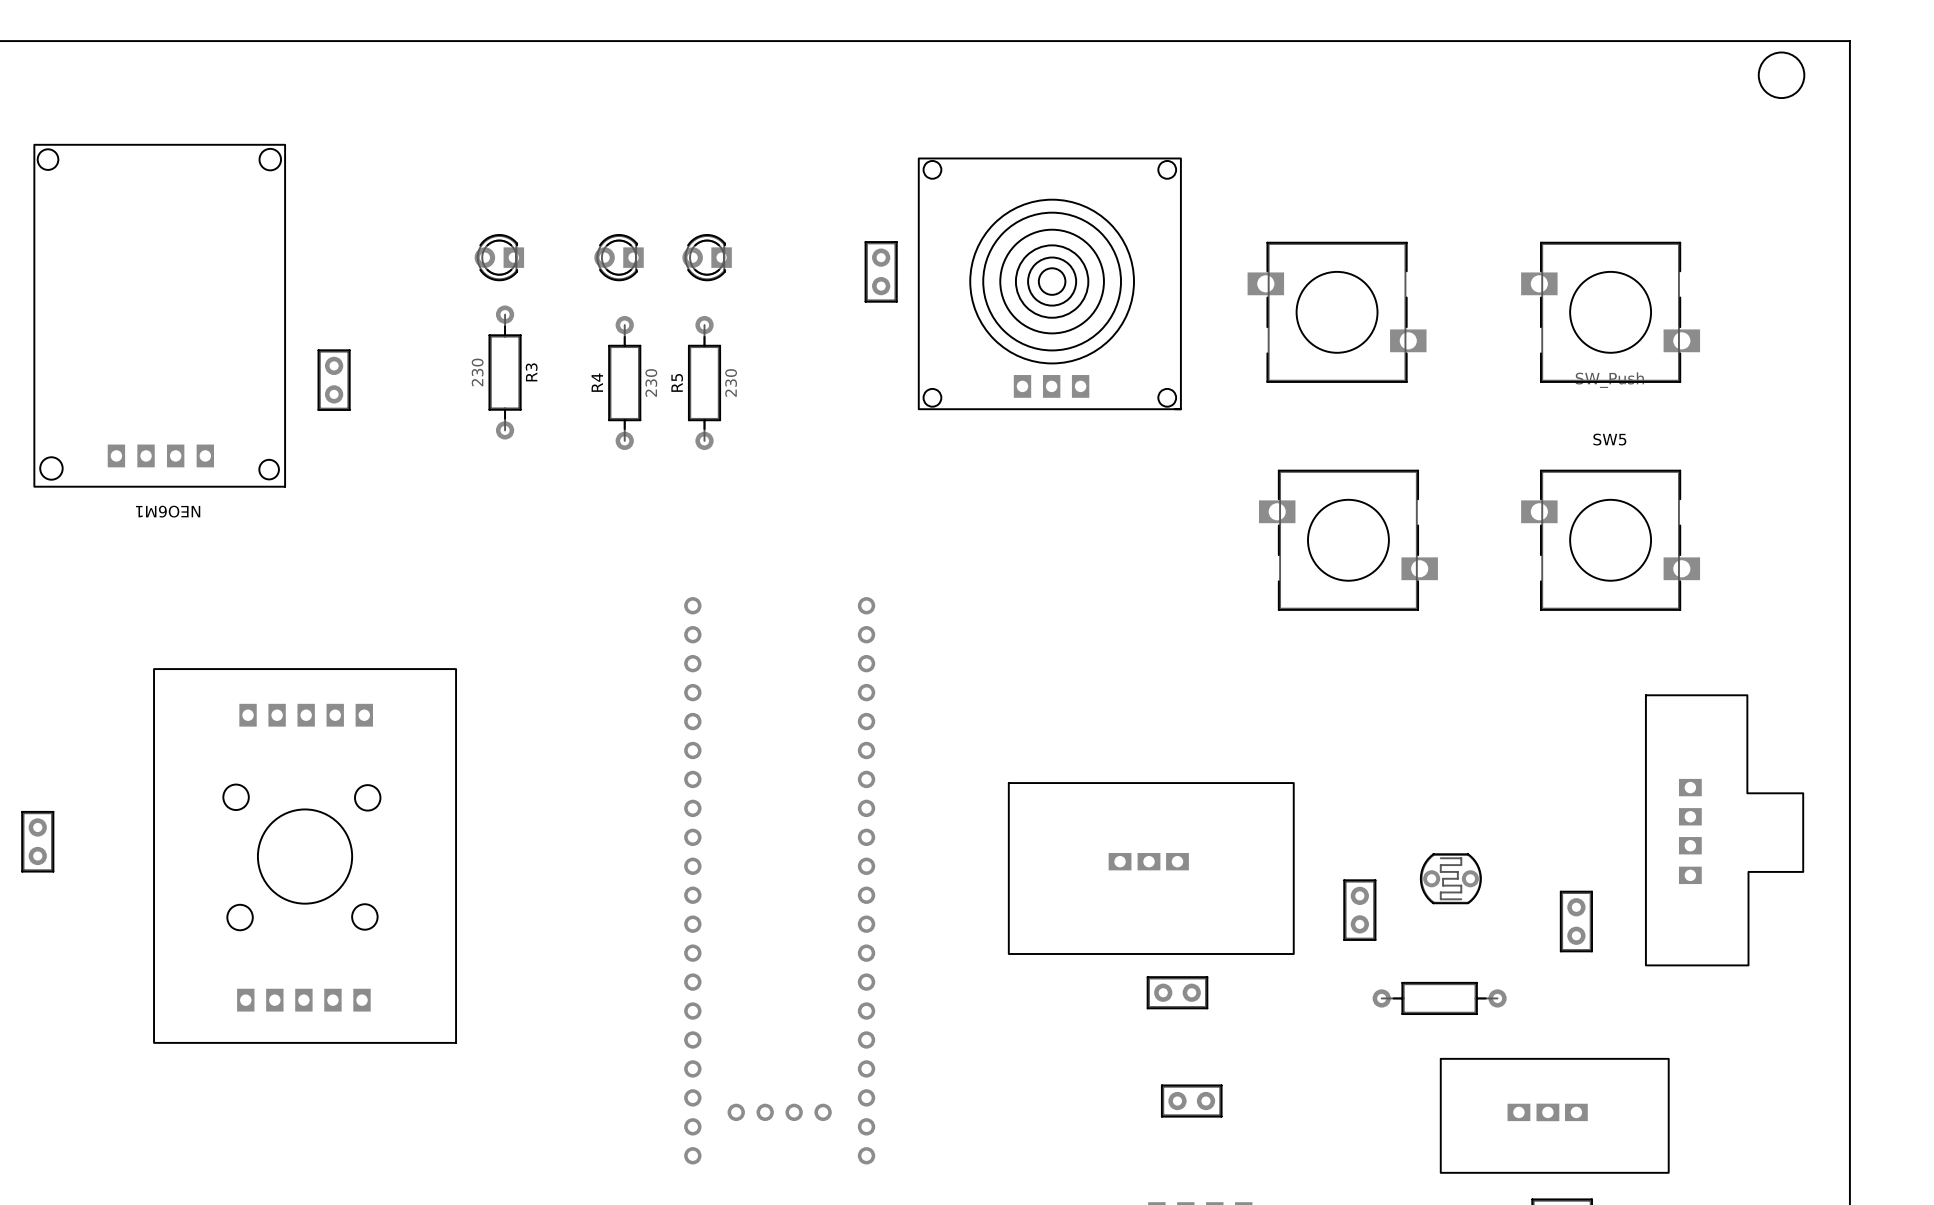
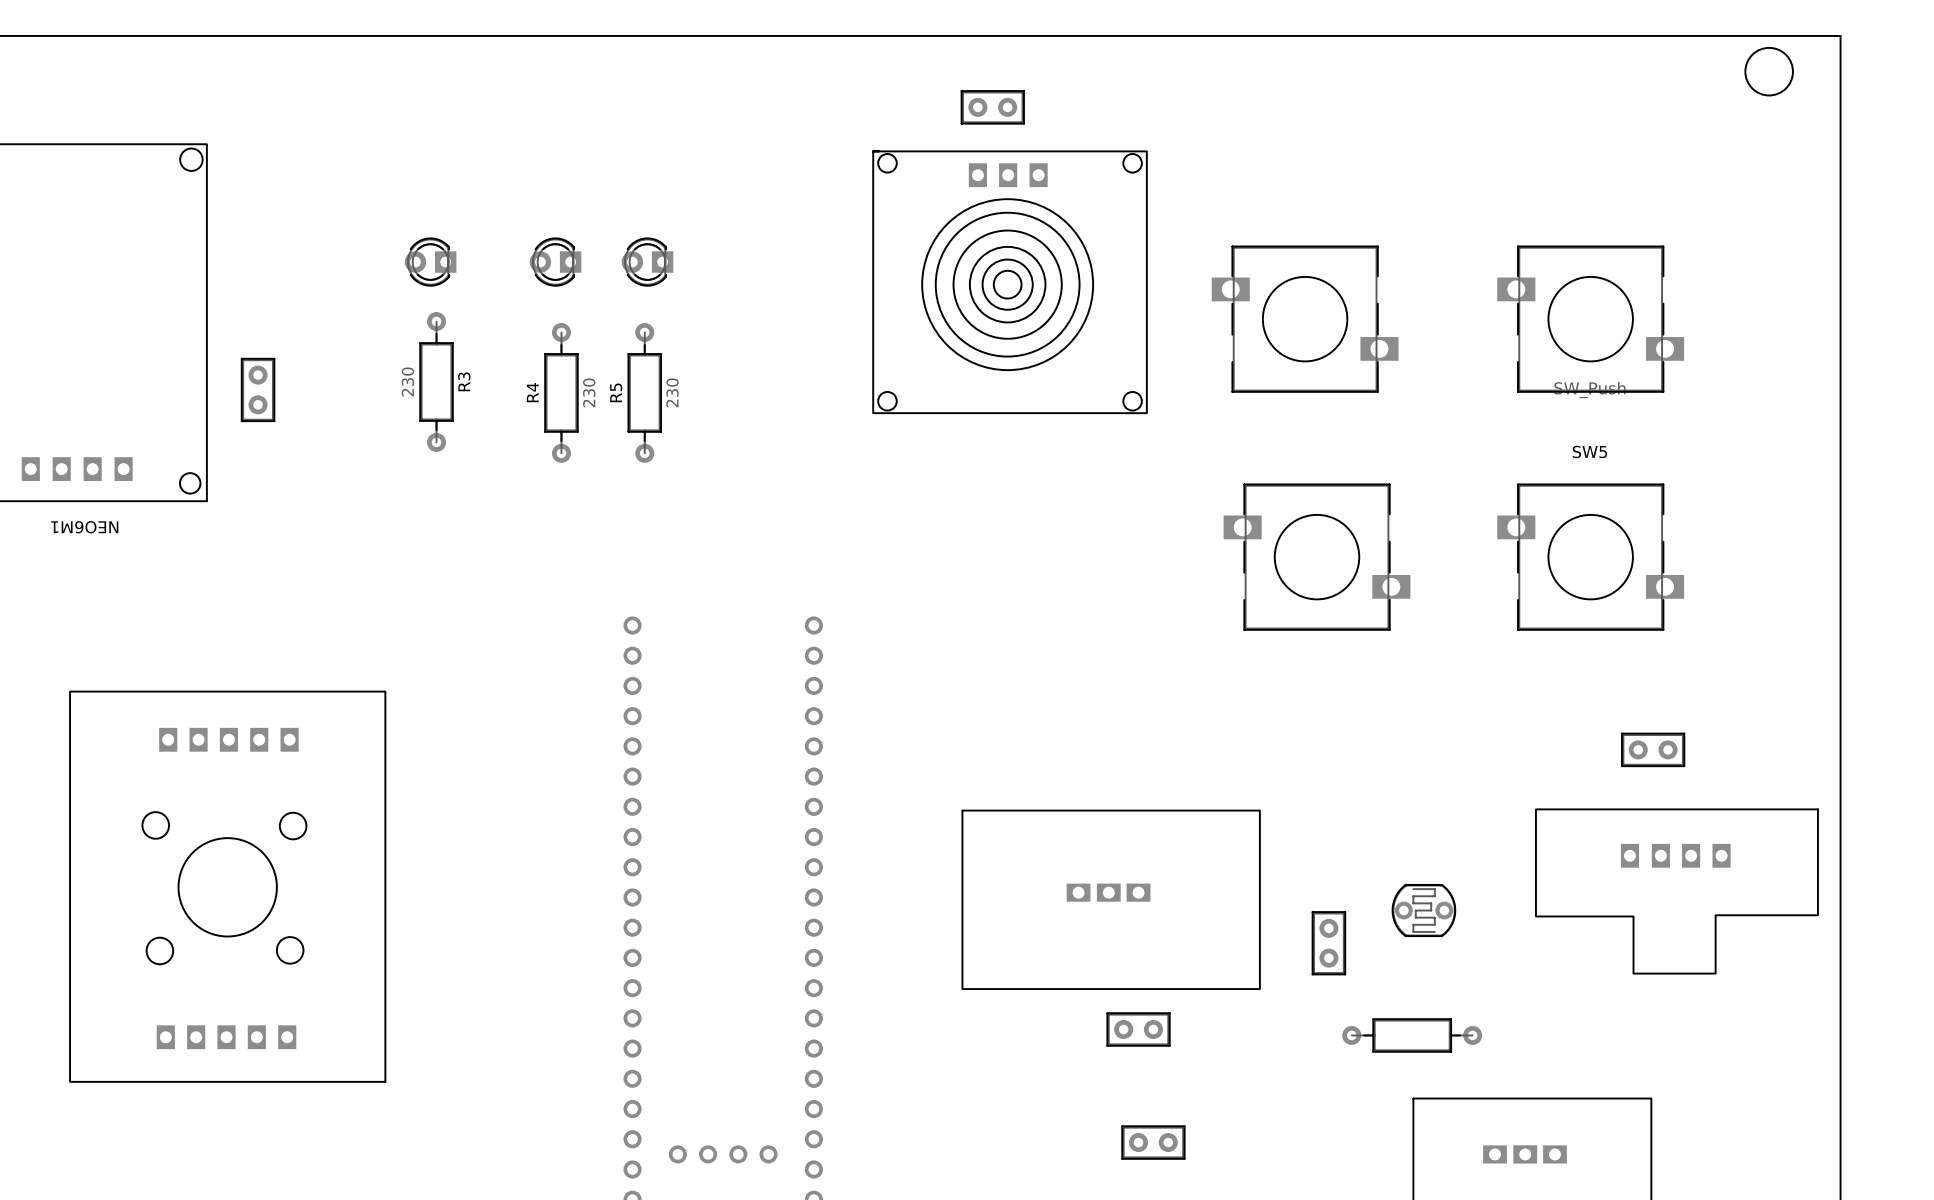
part rotation: 0° (881, 271) -> 90° clockwise (992, 107)
part position: (881, 271) -> (992, 107)
part rotation: 0° (1049, 283) -> 180° (1010, 282)
part rotation: 0° (1724, 830) -> 90° clockwise (1676, 891)
part rotation: 0° (1576, 921) -> 90° clockwise (1653, 749)
part position: (1576, 921) -> (1653, 749)

